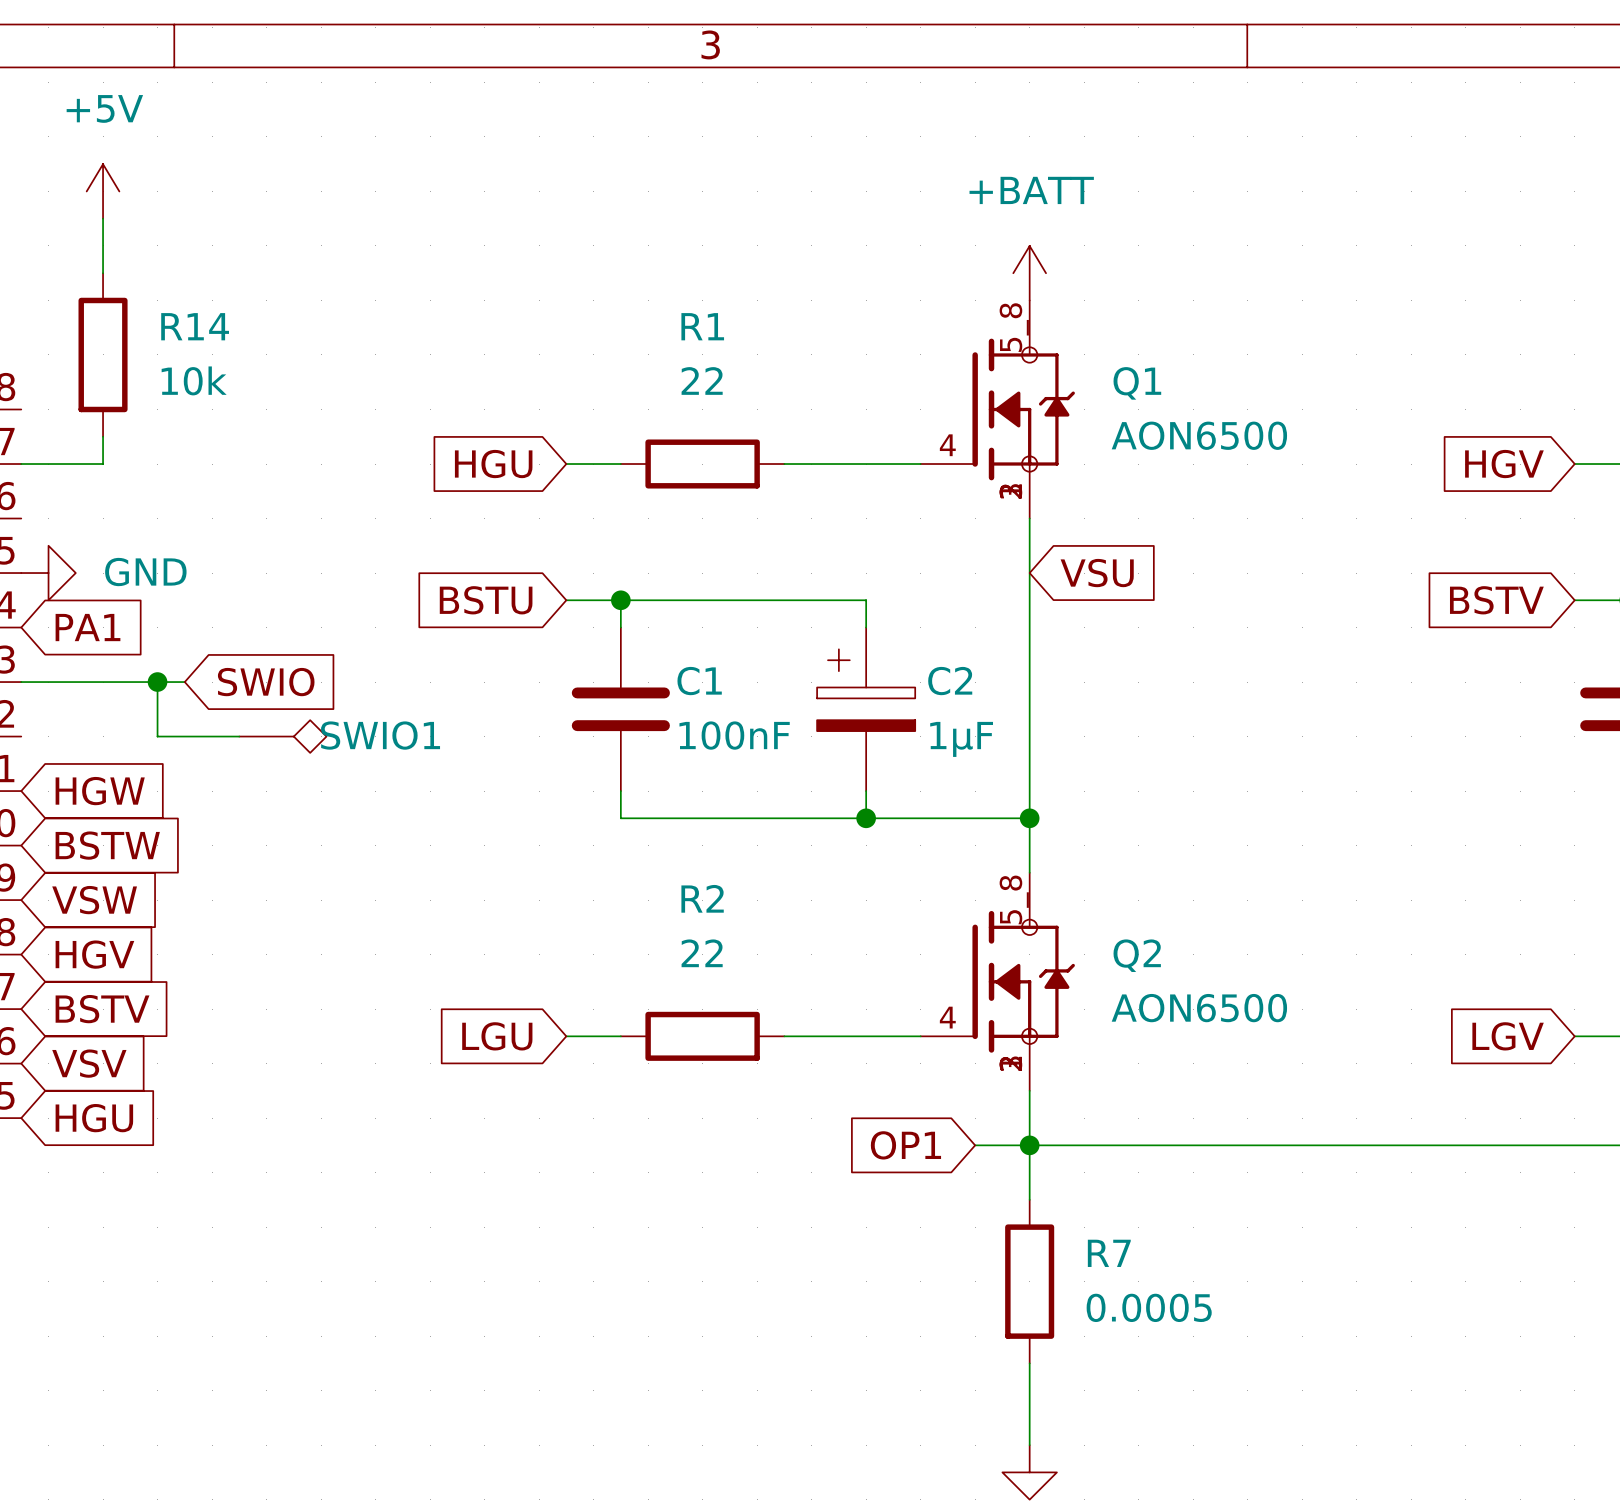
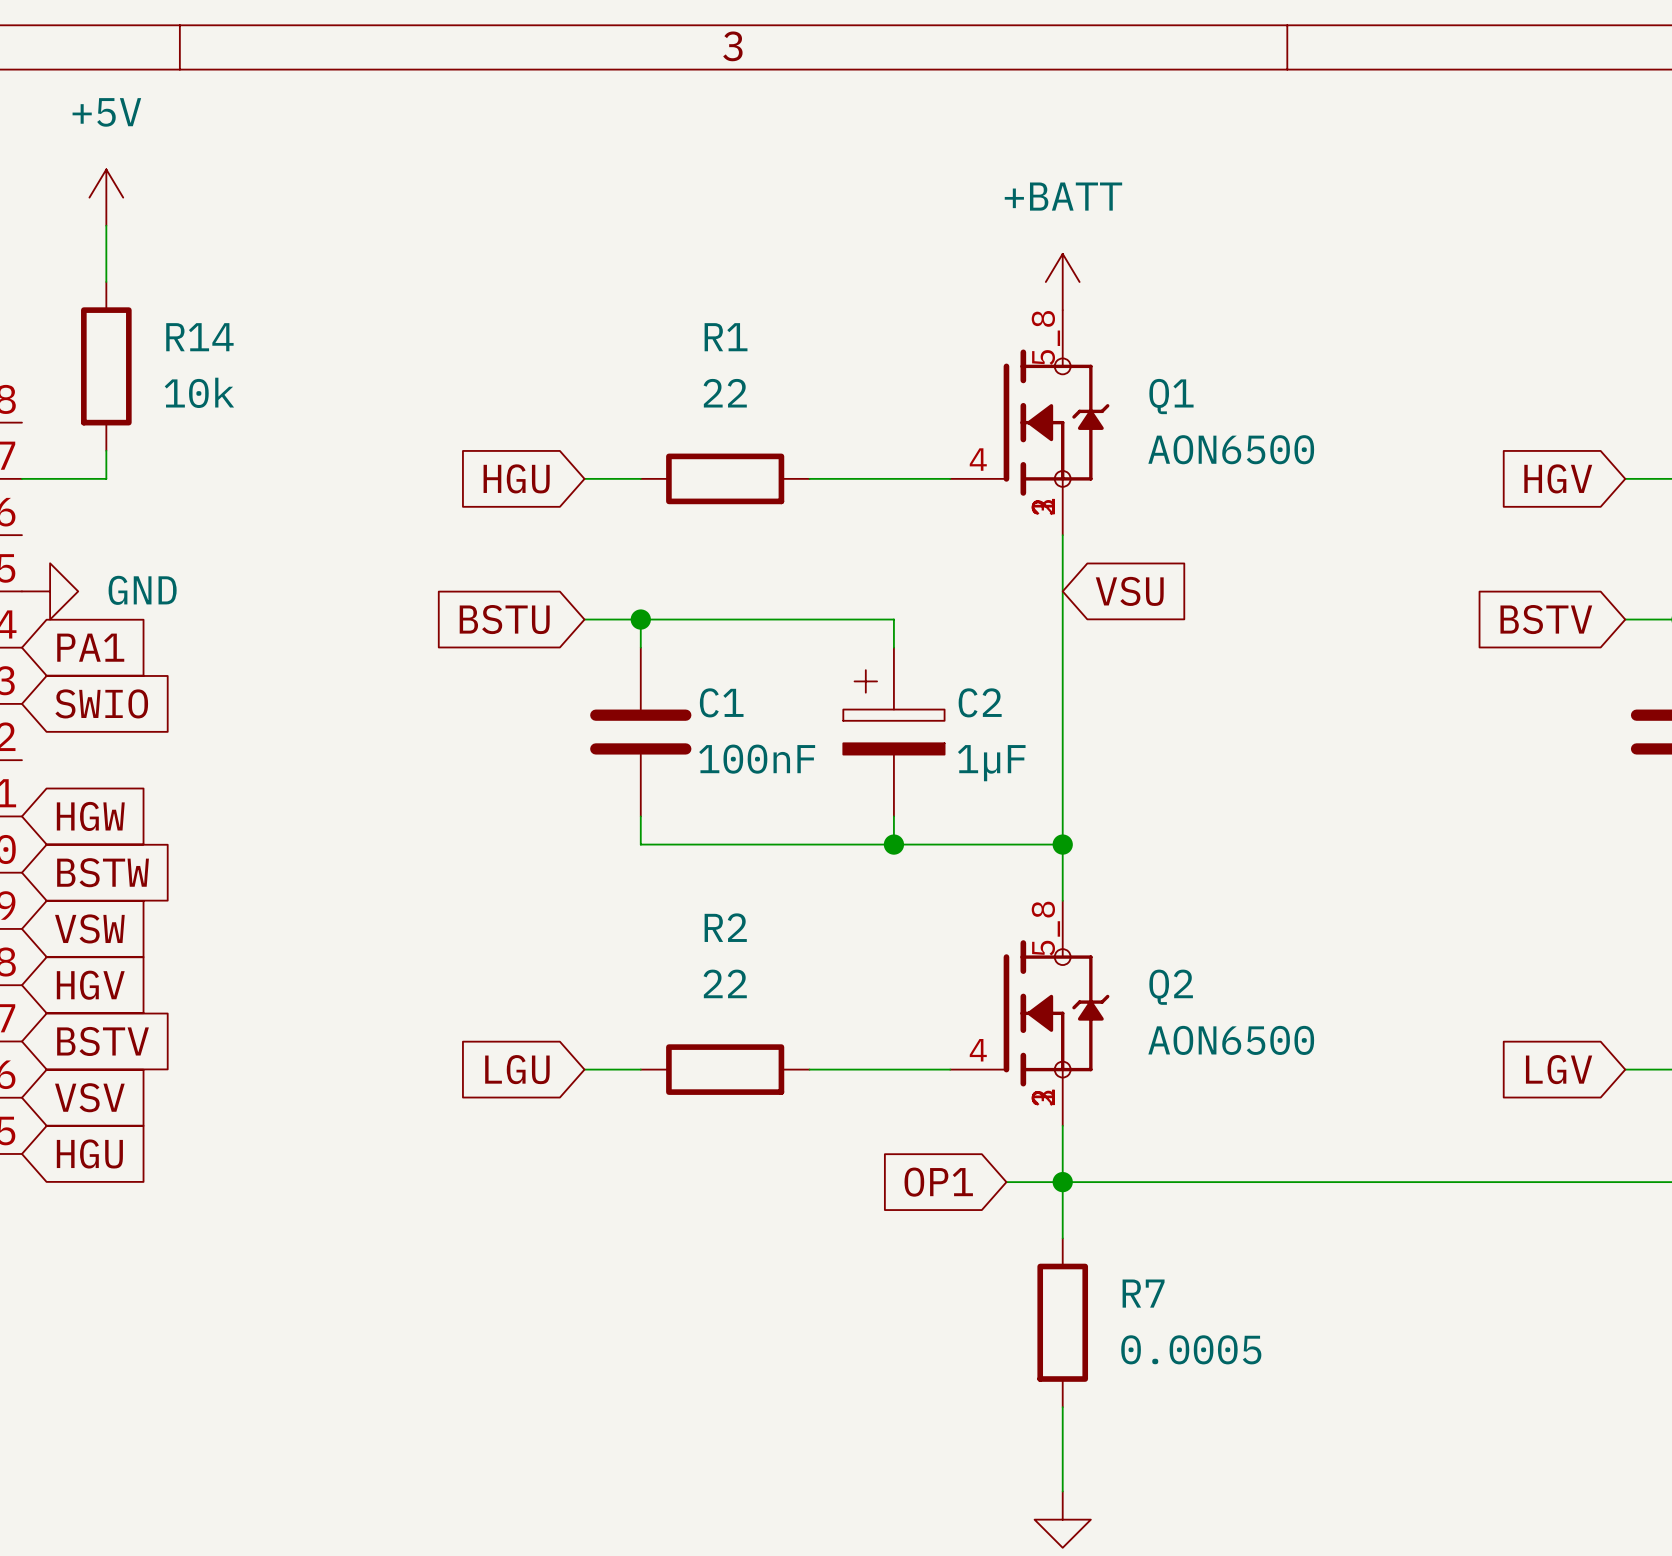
wire: (21, 682) (184, 682) -> none
wire: (157, 682) (157, 736) (239, 736) -> none
junction: (157, 682) -> none
global label position: SWIO (266, 682) -> SWIO (101, 703)
SWIO1: (282, 736) -> none

